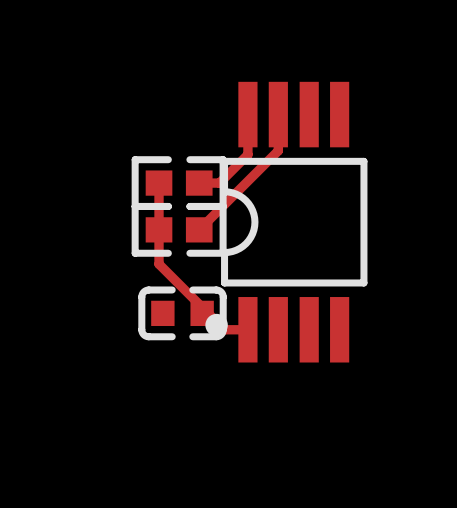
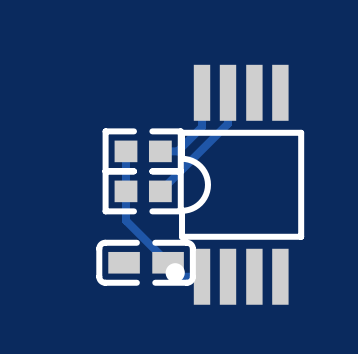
part footprint: [138, 286, 227, 341] -> [96, 239, 196, 286]

